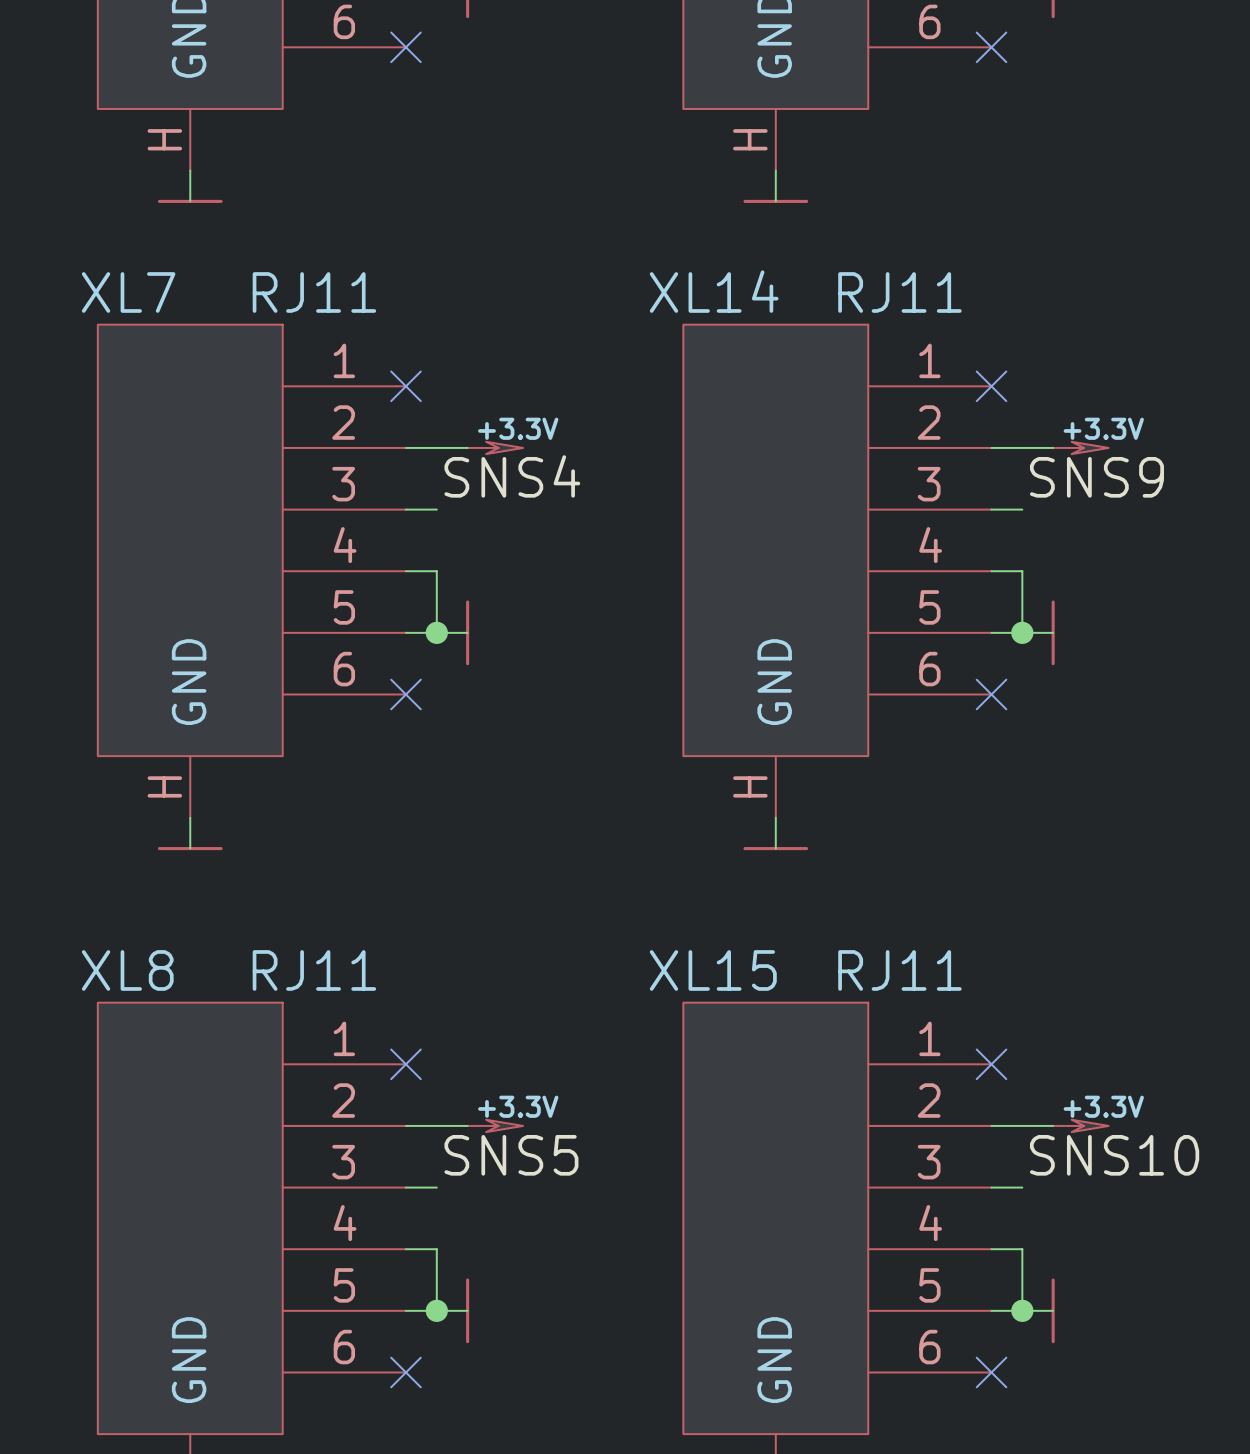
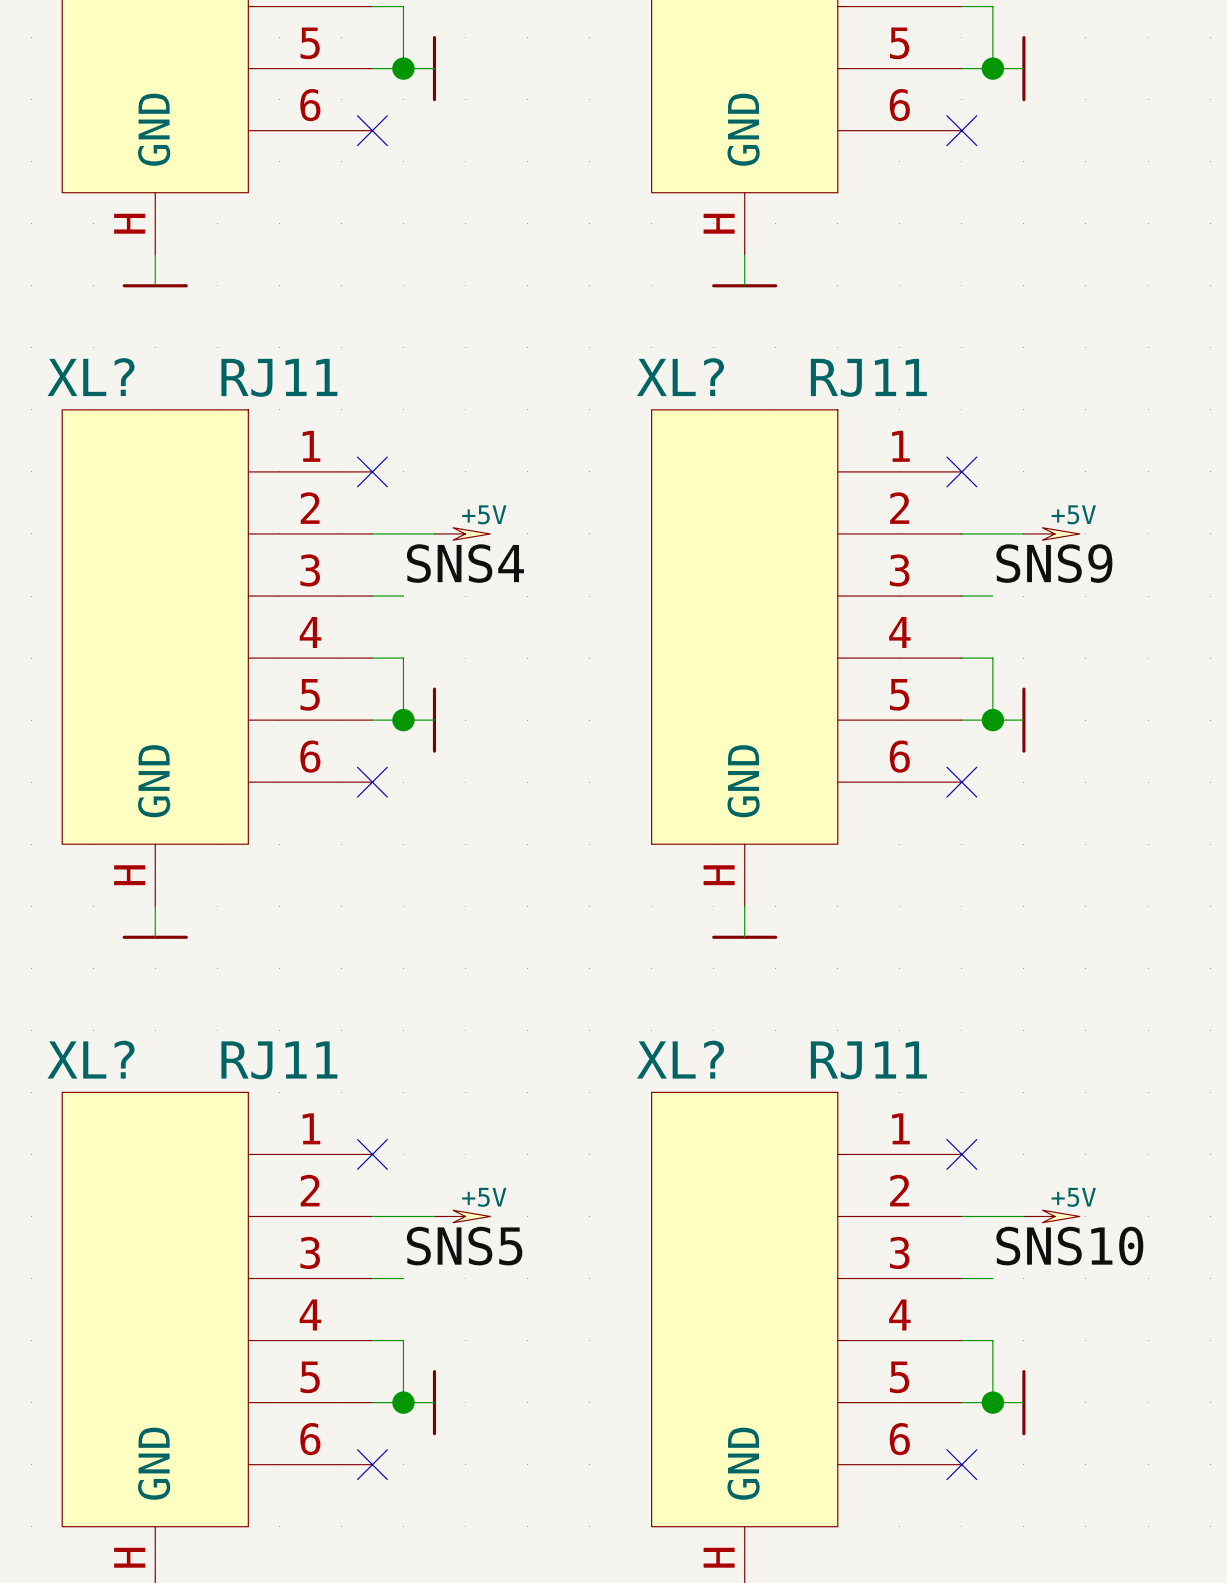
XL14 name: XL14 (714, 291) -> XL? (680, 377)
XL7 name: XL7 (128, 292) -> XL? (91, 377)
power symbol: +3.3V (495, 447) -> +5V (462, 533)
power symbol: +3.3V (1080, 447) -> +5V (1051, 533)
XL8 name: XL8 (127, 970) -> XL? (91, 1059)
XL15 name: XL15 (713, 970) -> XL? (680, 1059)
power symbol: +3.3V (495, 1125) -> +5V (462, 1216)
power symbol: +3.3V (1080, 1125) -> +5V (1051, 1216)

